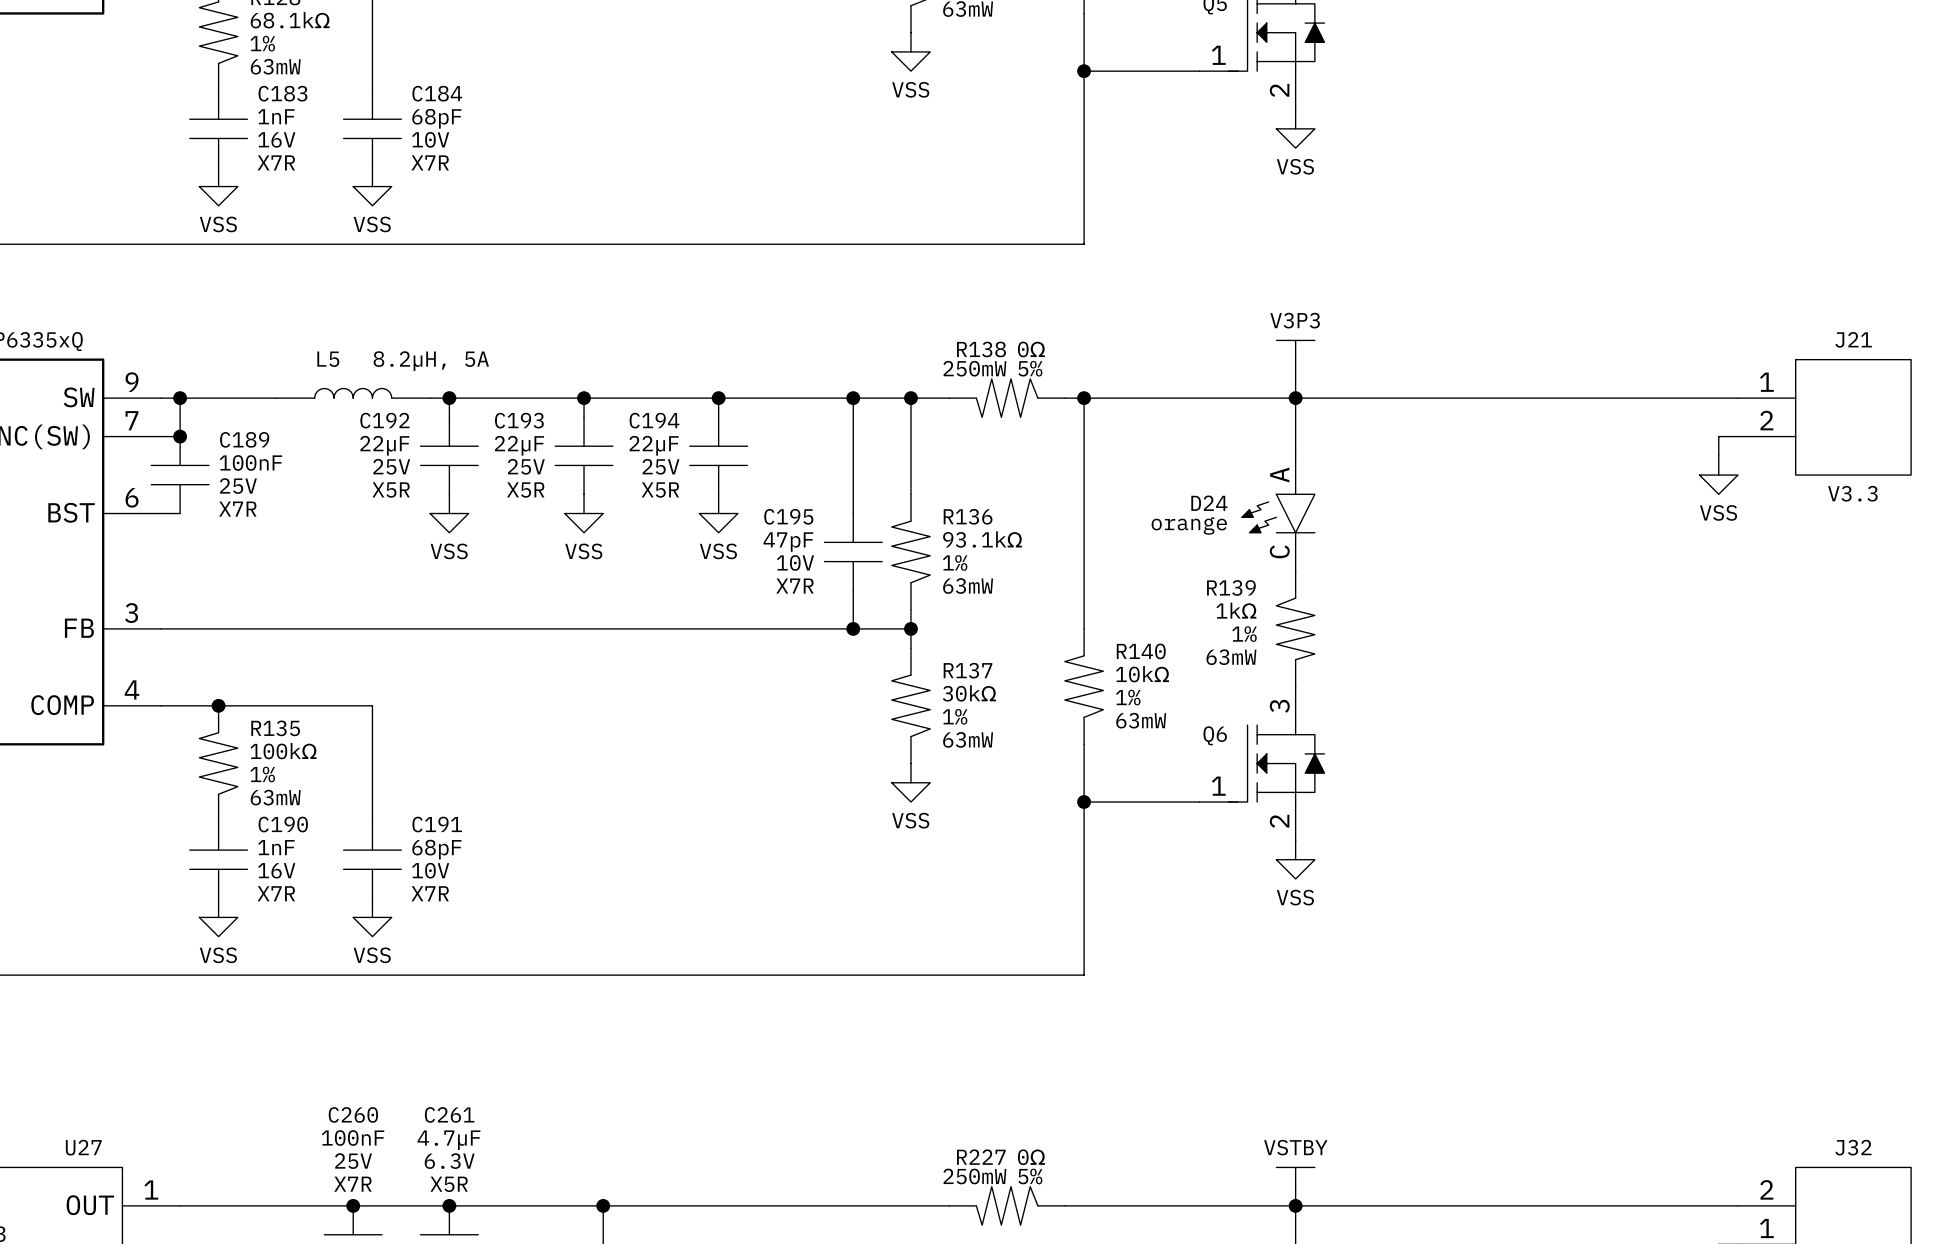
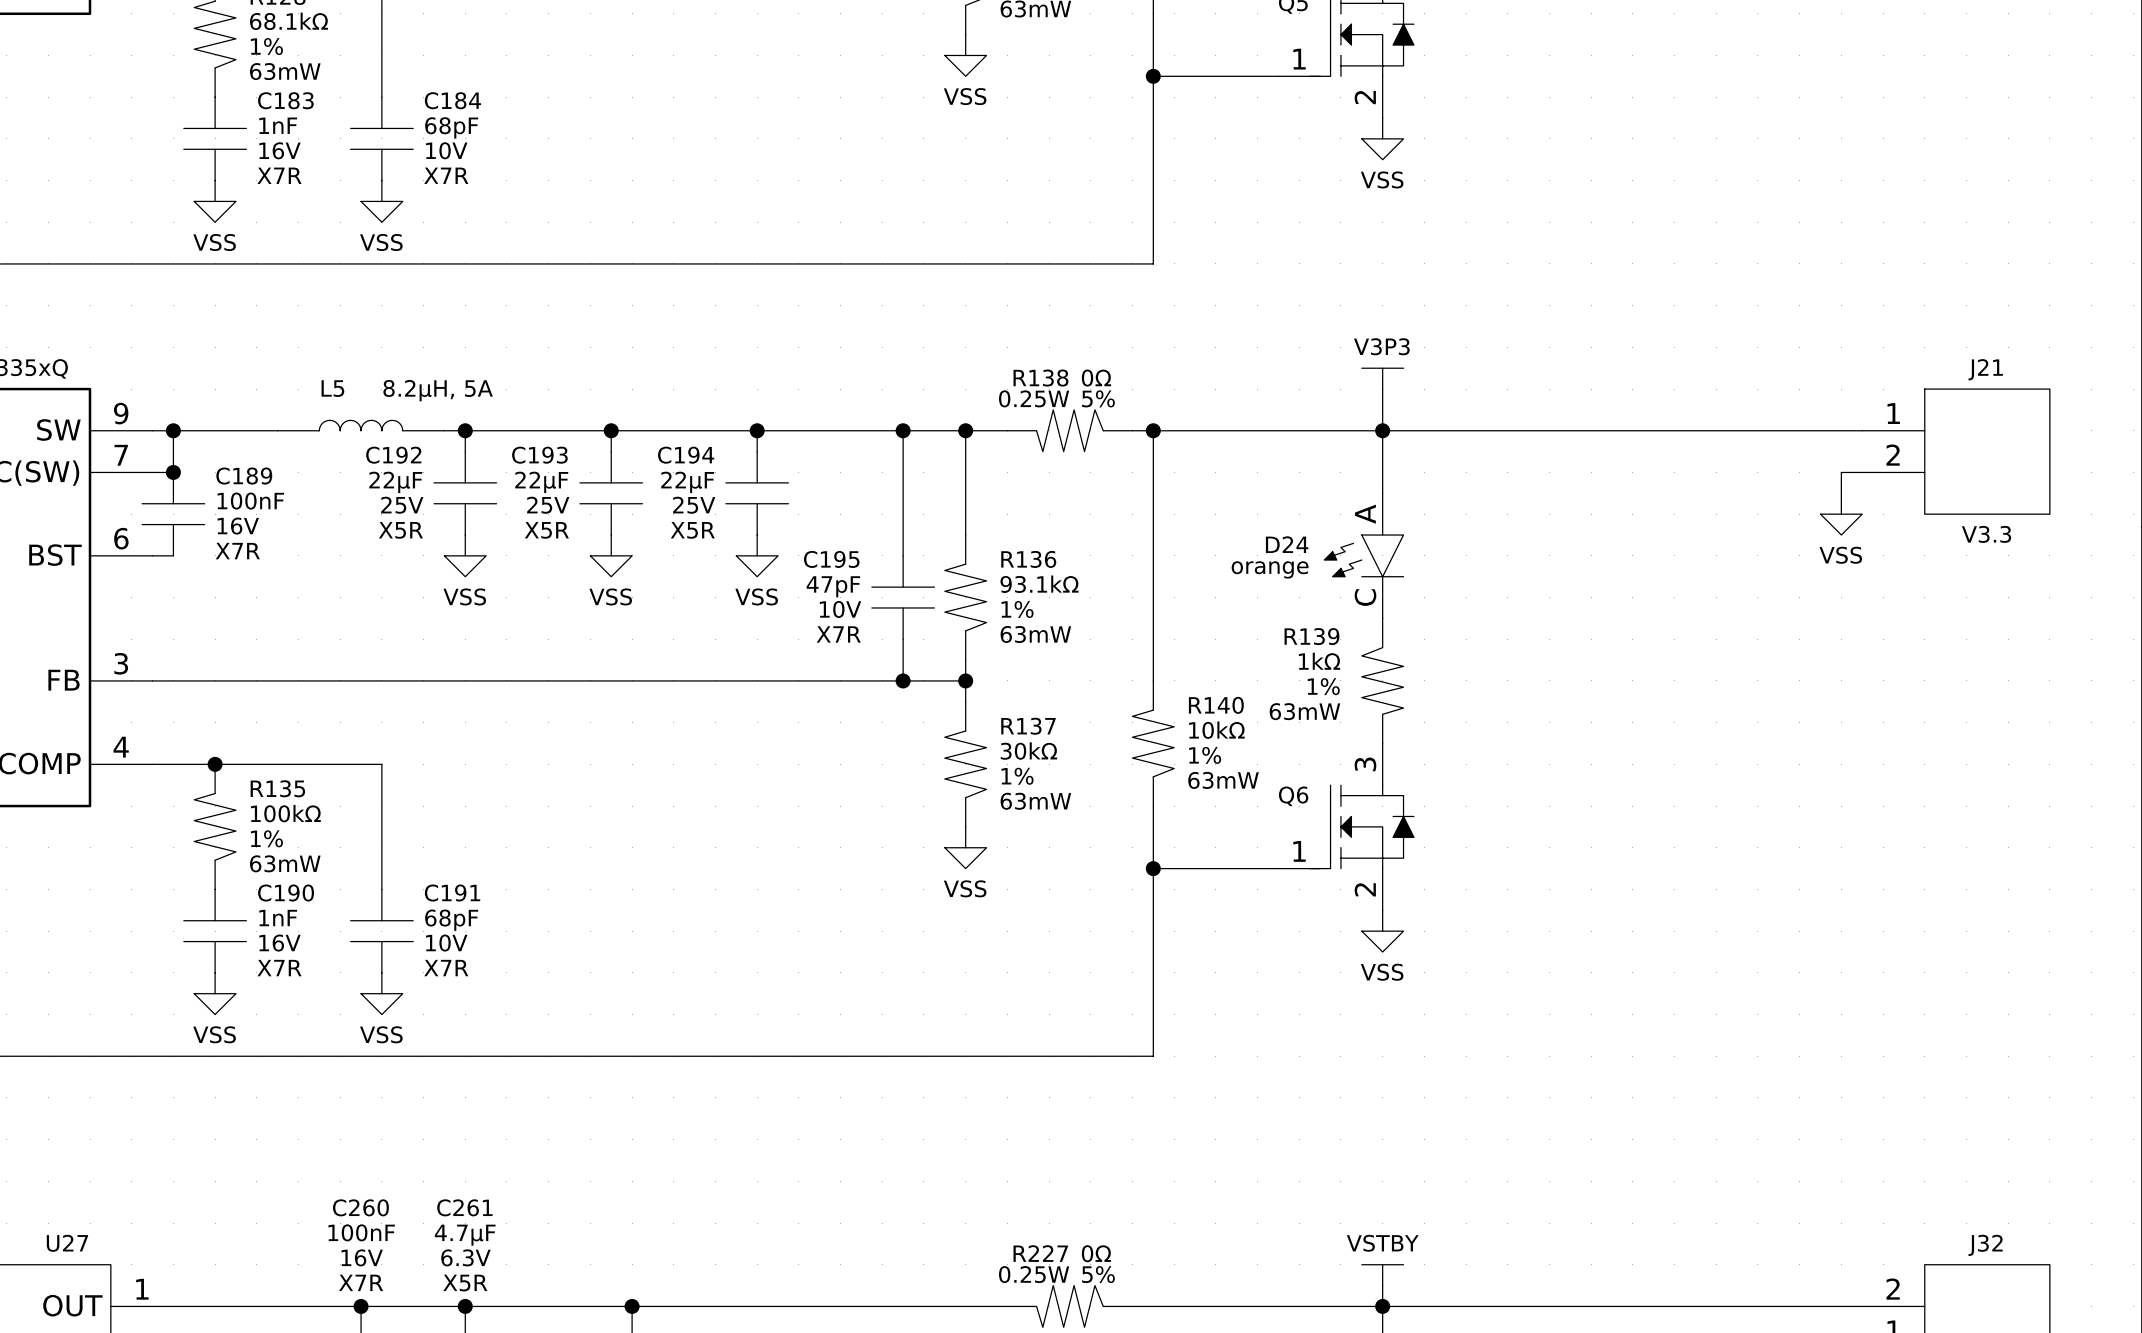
R138 text: 250mW (974, 368) -> 0.25W (1034, 398)
C189 text: 25V (238, 486) -> 16V (238, 526)
C260 text: 25V (353, 1161) -> 16V (362, 1257)
R227 text: 250mW (974, 1176) -> 0.25W (1034, 1274)

